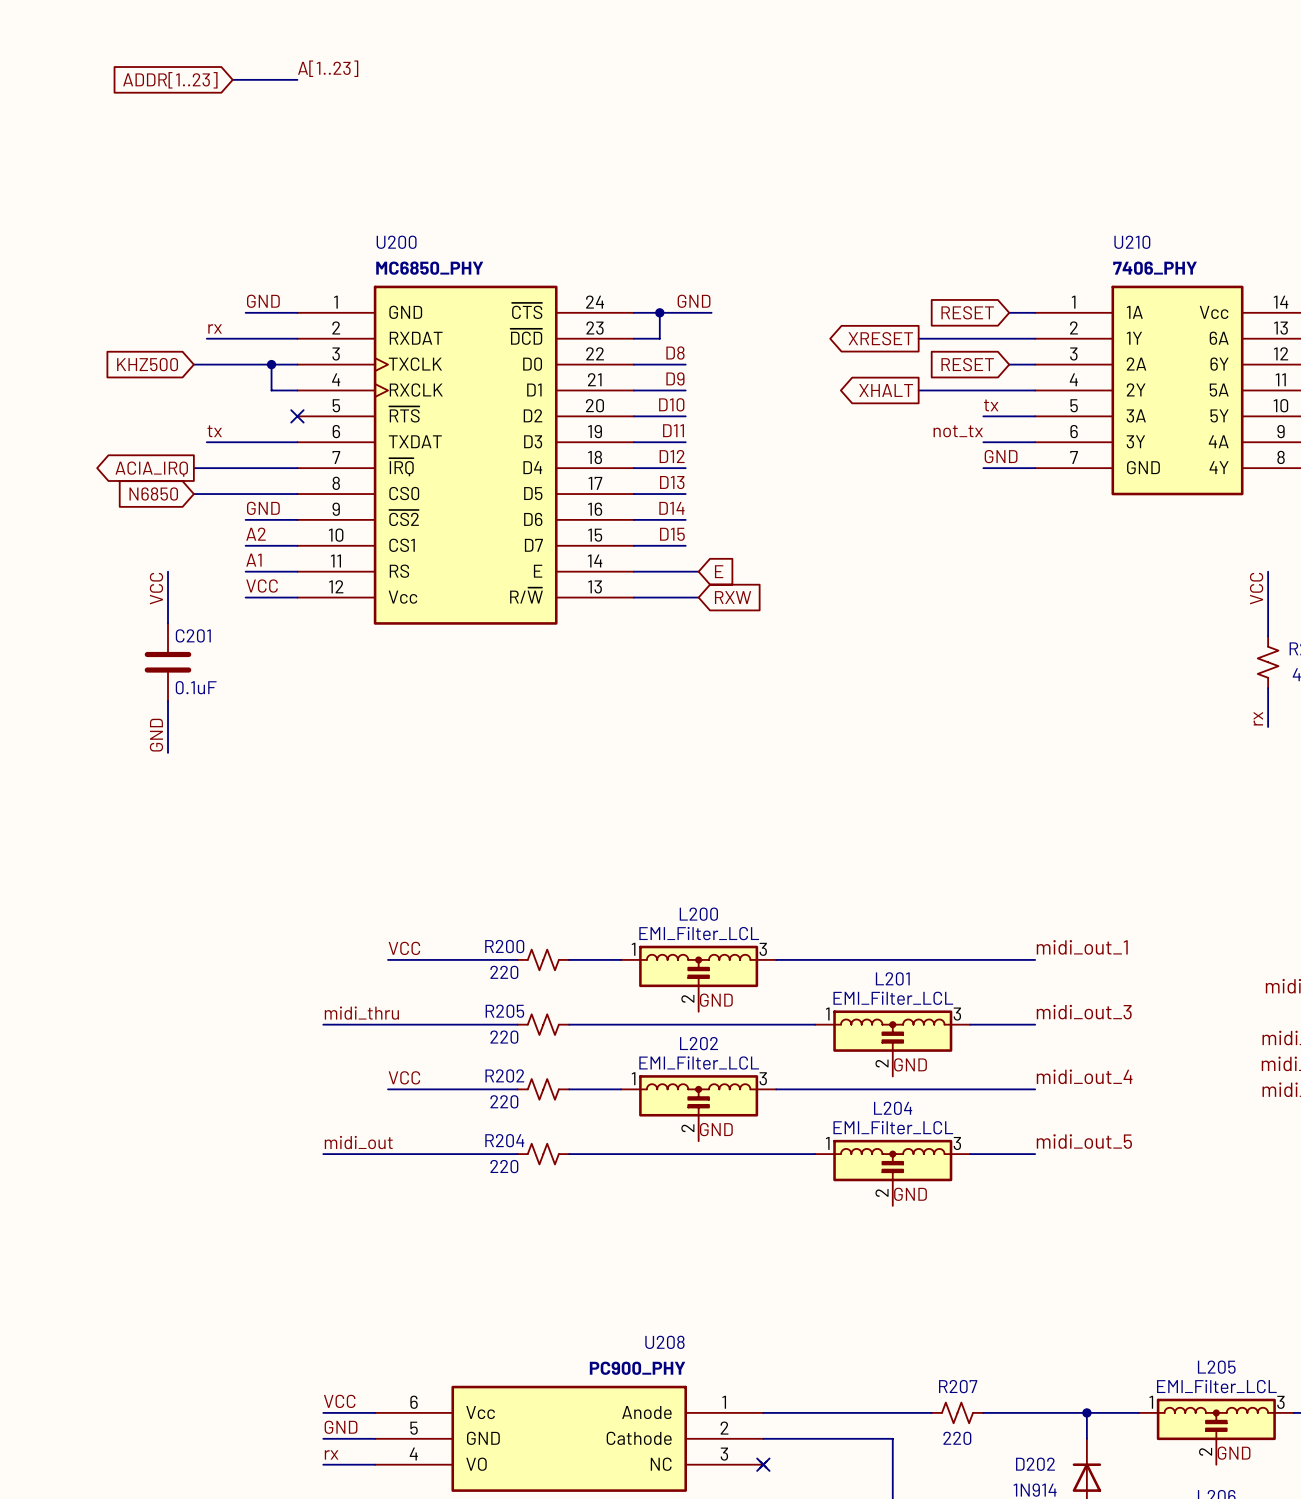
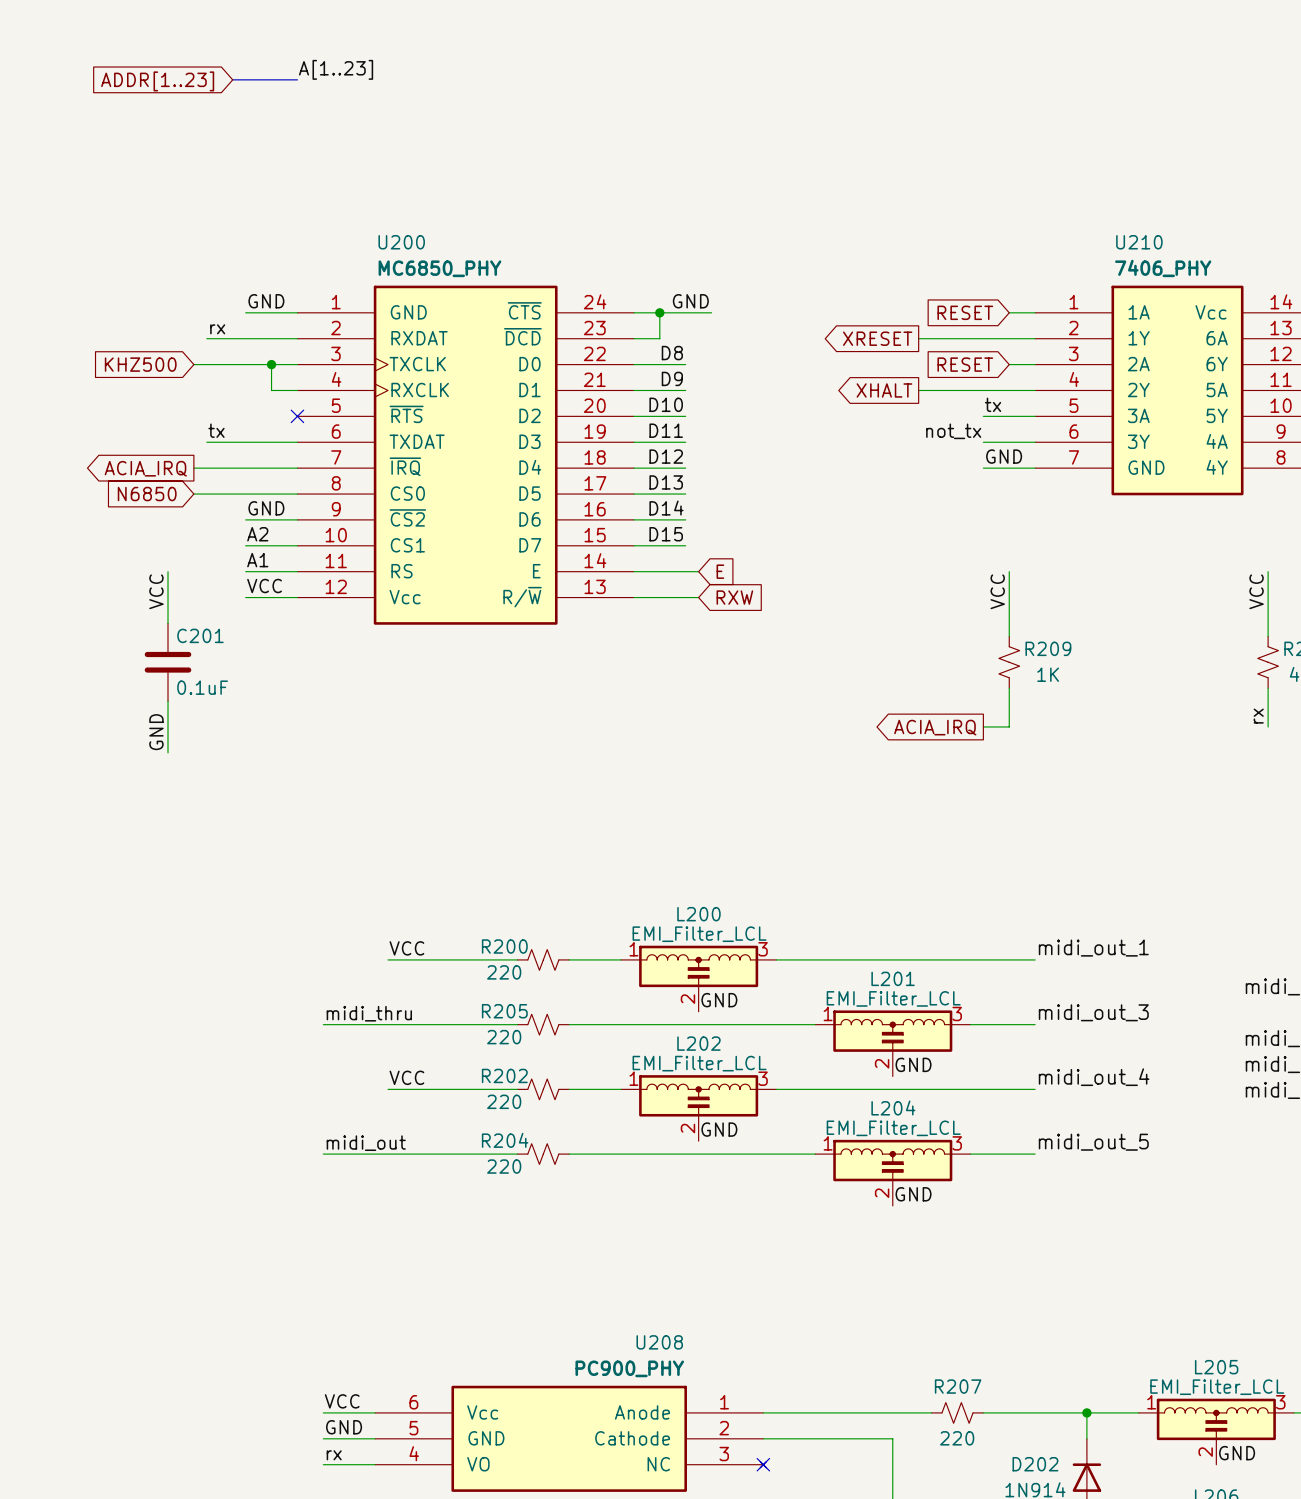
wire: none -> (1009, 571) (1009, 636)
label: none -> VCC (997, 591)
R209: none -> 1K (1009, 662)
wire: none -> (1009, 688) (1009, 726) (983, 726)
global label: none -> ACIA_IRQ (935, 727)

